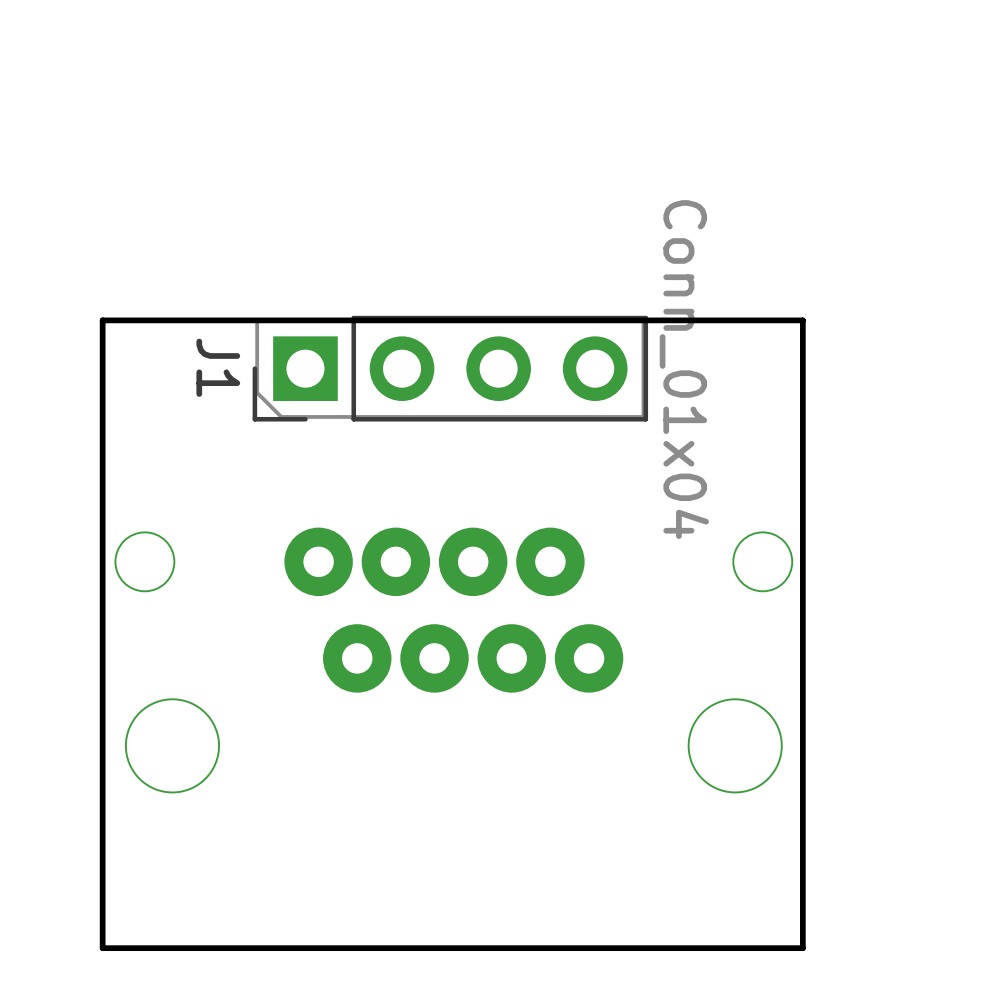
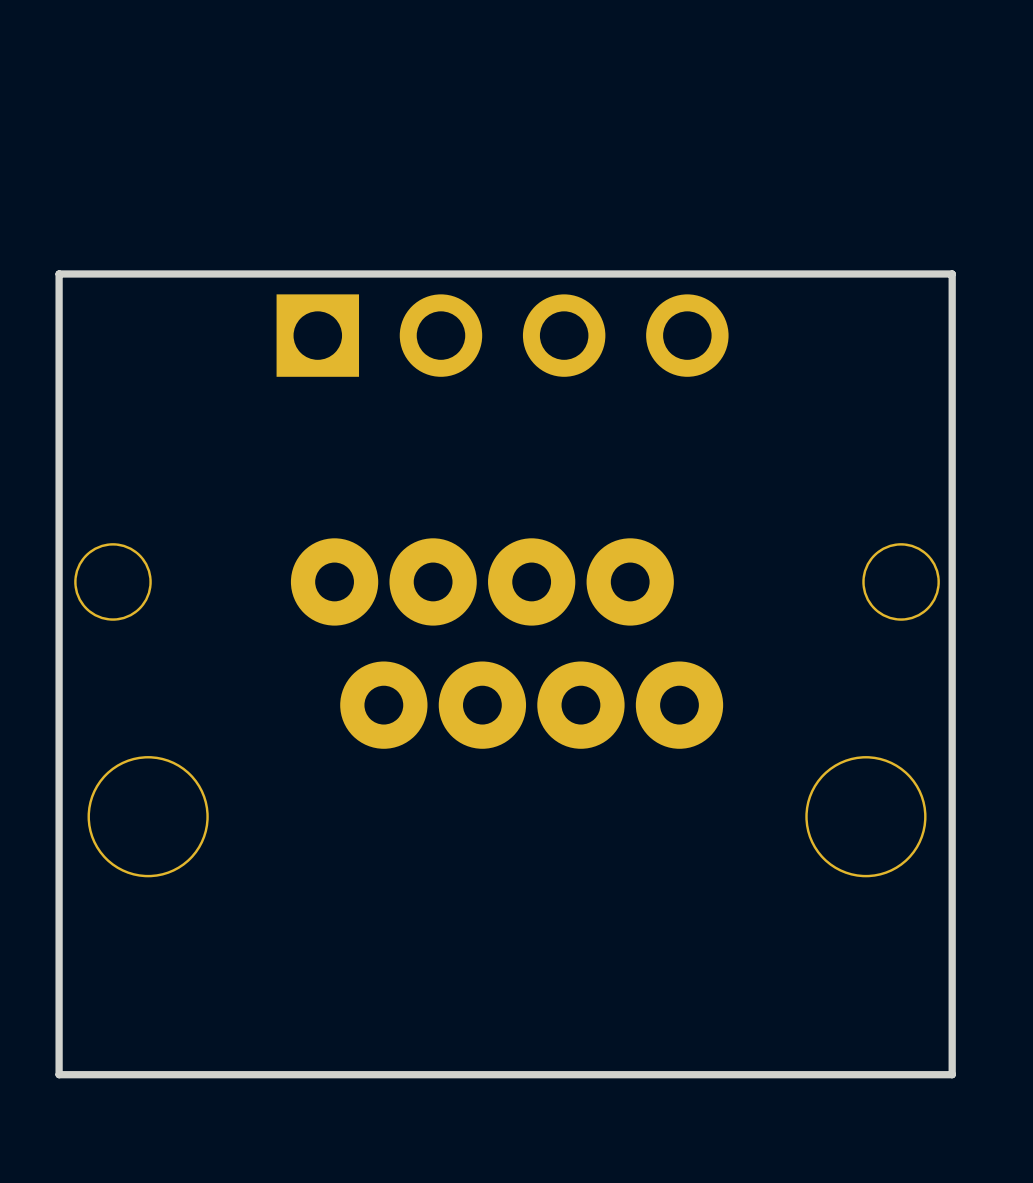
J1 side: bottom (450, 368) -> top (502, 335)

